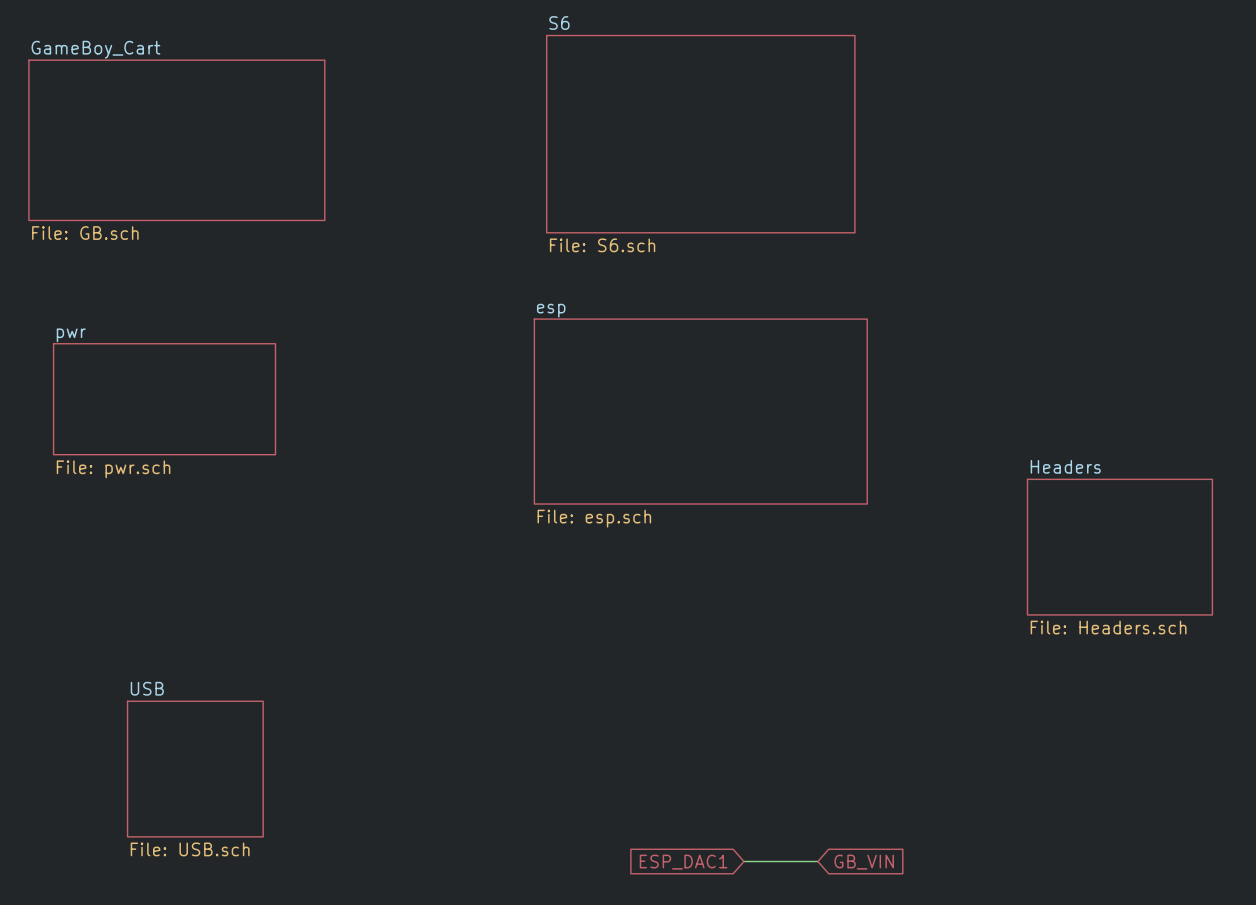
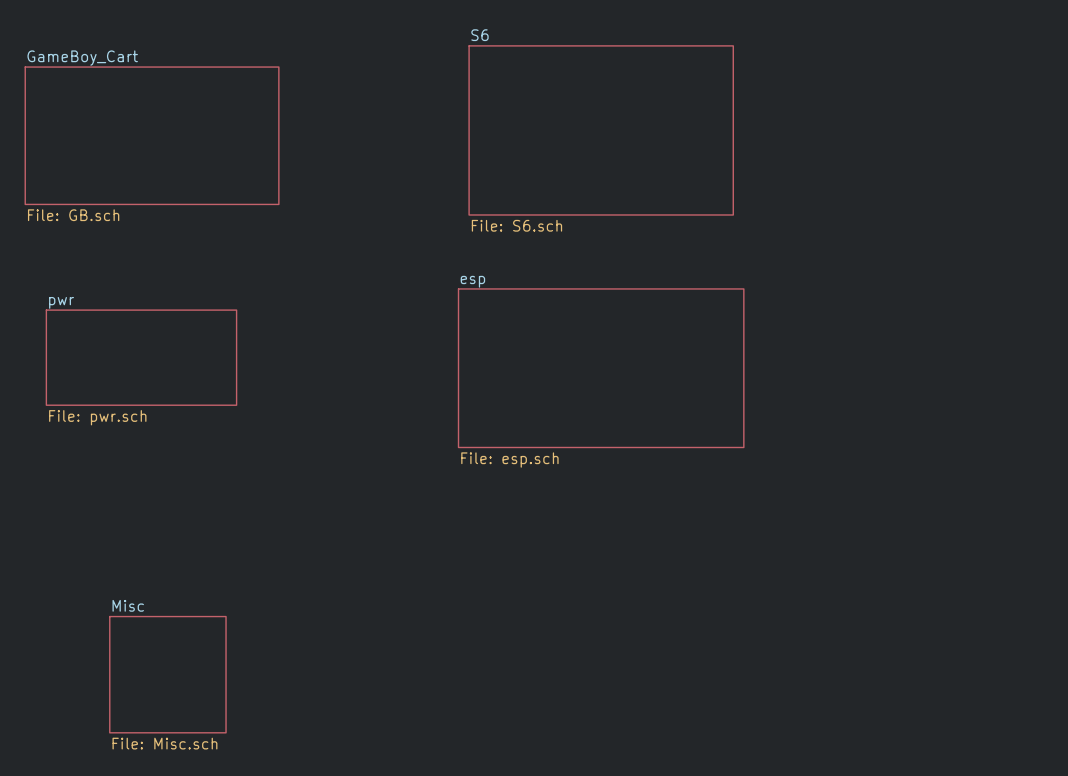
sheet Headers: File: Headers.sch (1119, 547) -> none
sheet USB name: USB (147, 688) -> Misc (128, 605)
sheet USB value: File: USB.sch (190, 849) -> File: Misc.sch (164, 743)
wire: (743, 861) (817, 861) -> none
global label: ESP_DAC1 (683, 862) -> none
global label: GB_VIN (864, 862) -> none

